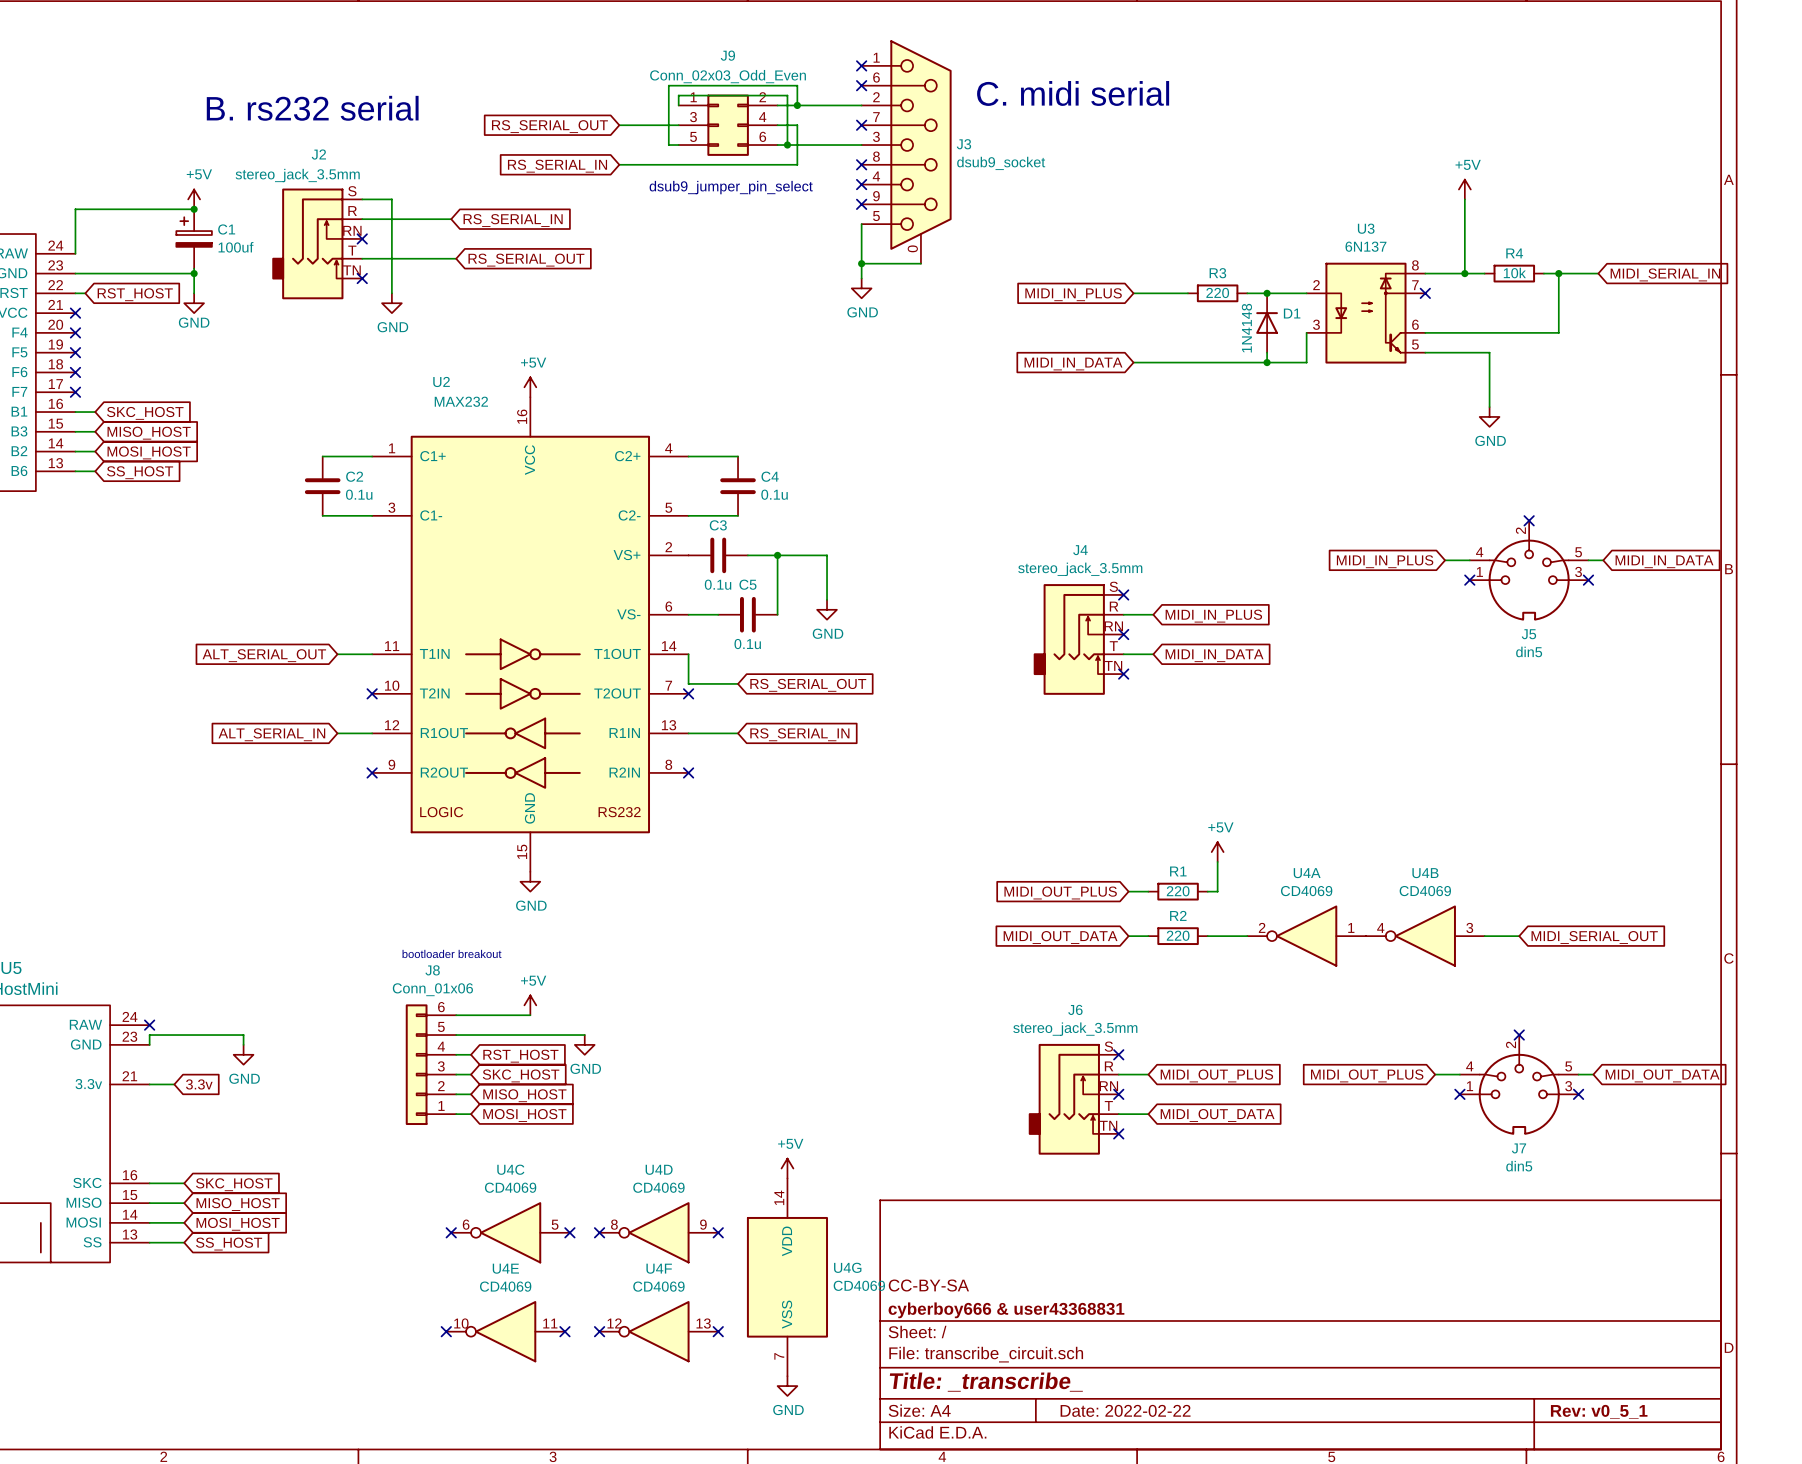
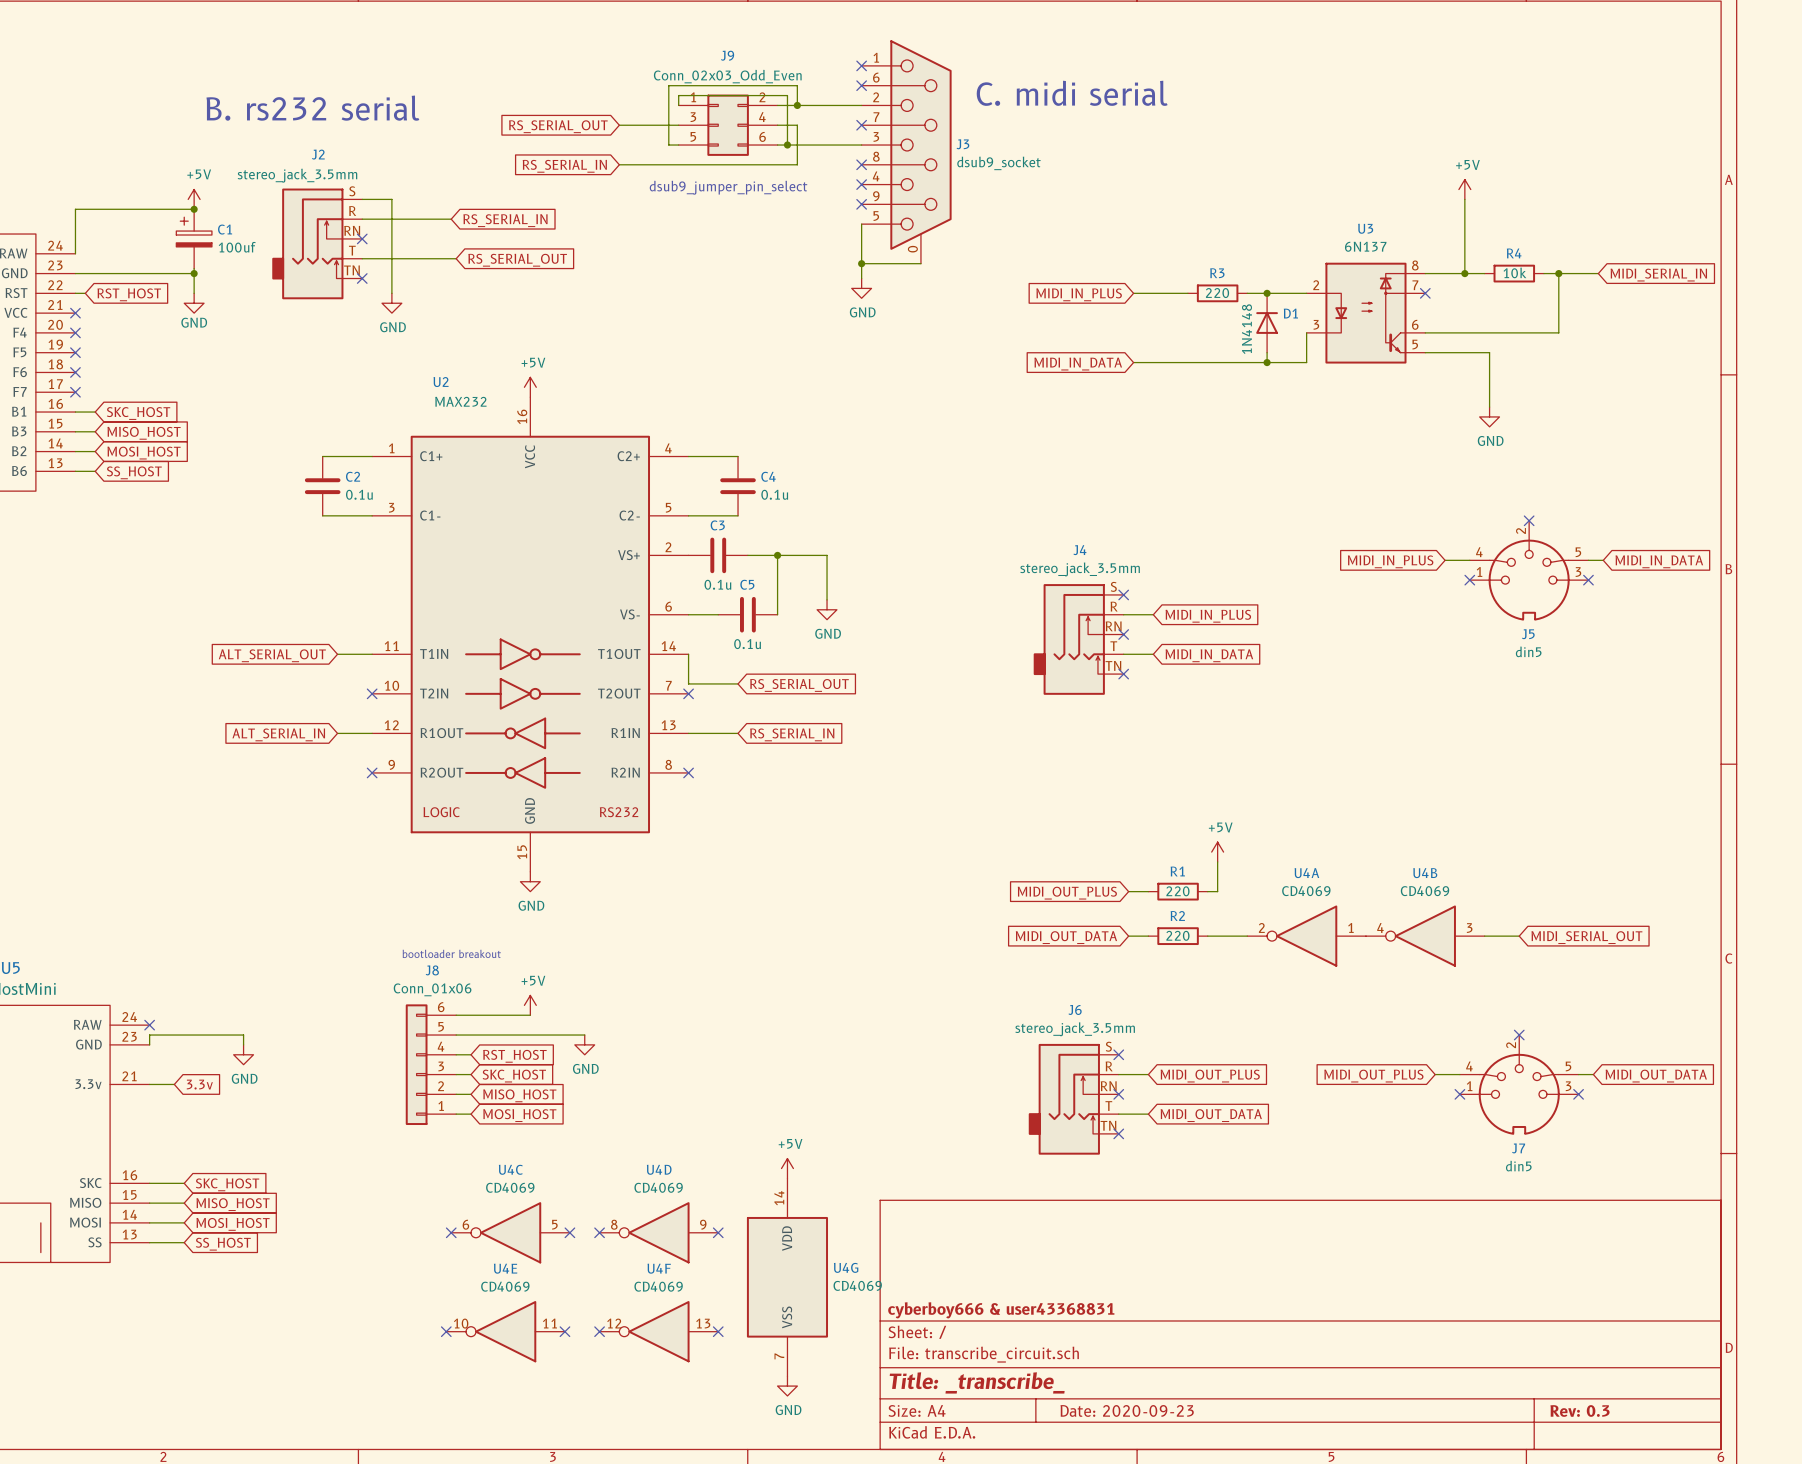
title block: CC-BY-SA (928, 1285) -> none
title block: Date: 2022-02-22 (1125, 1410) -> Date: 2020-09-23 (1127, 1410)
title block: Rev: v0_5_1 (1599, 1411) -> Rev: 0.3 (1580, 1411)

